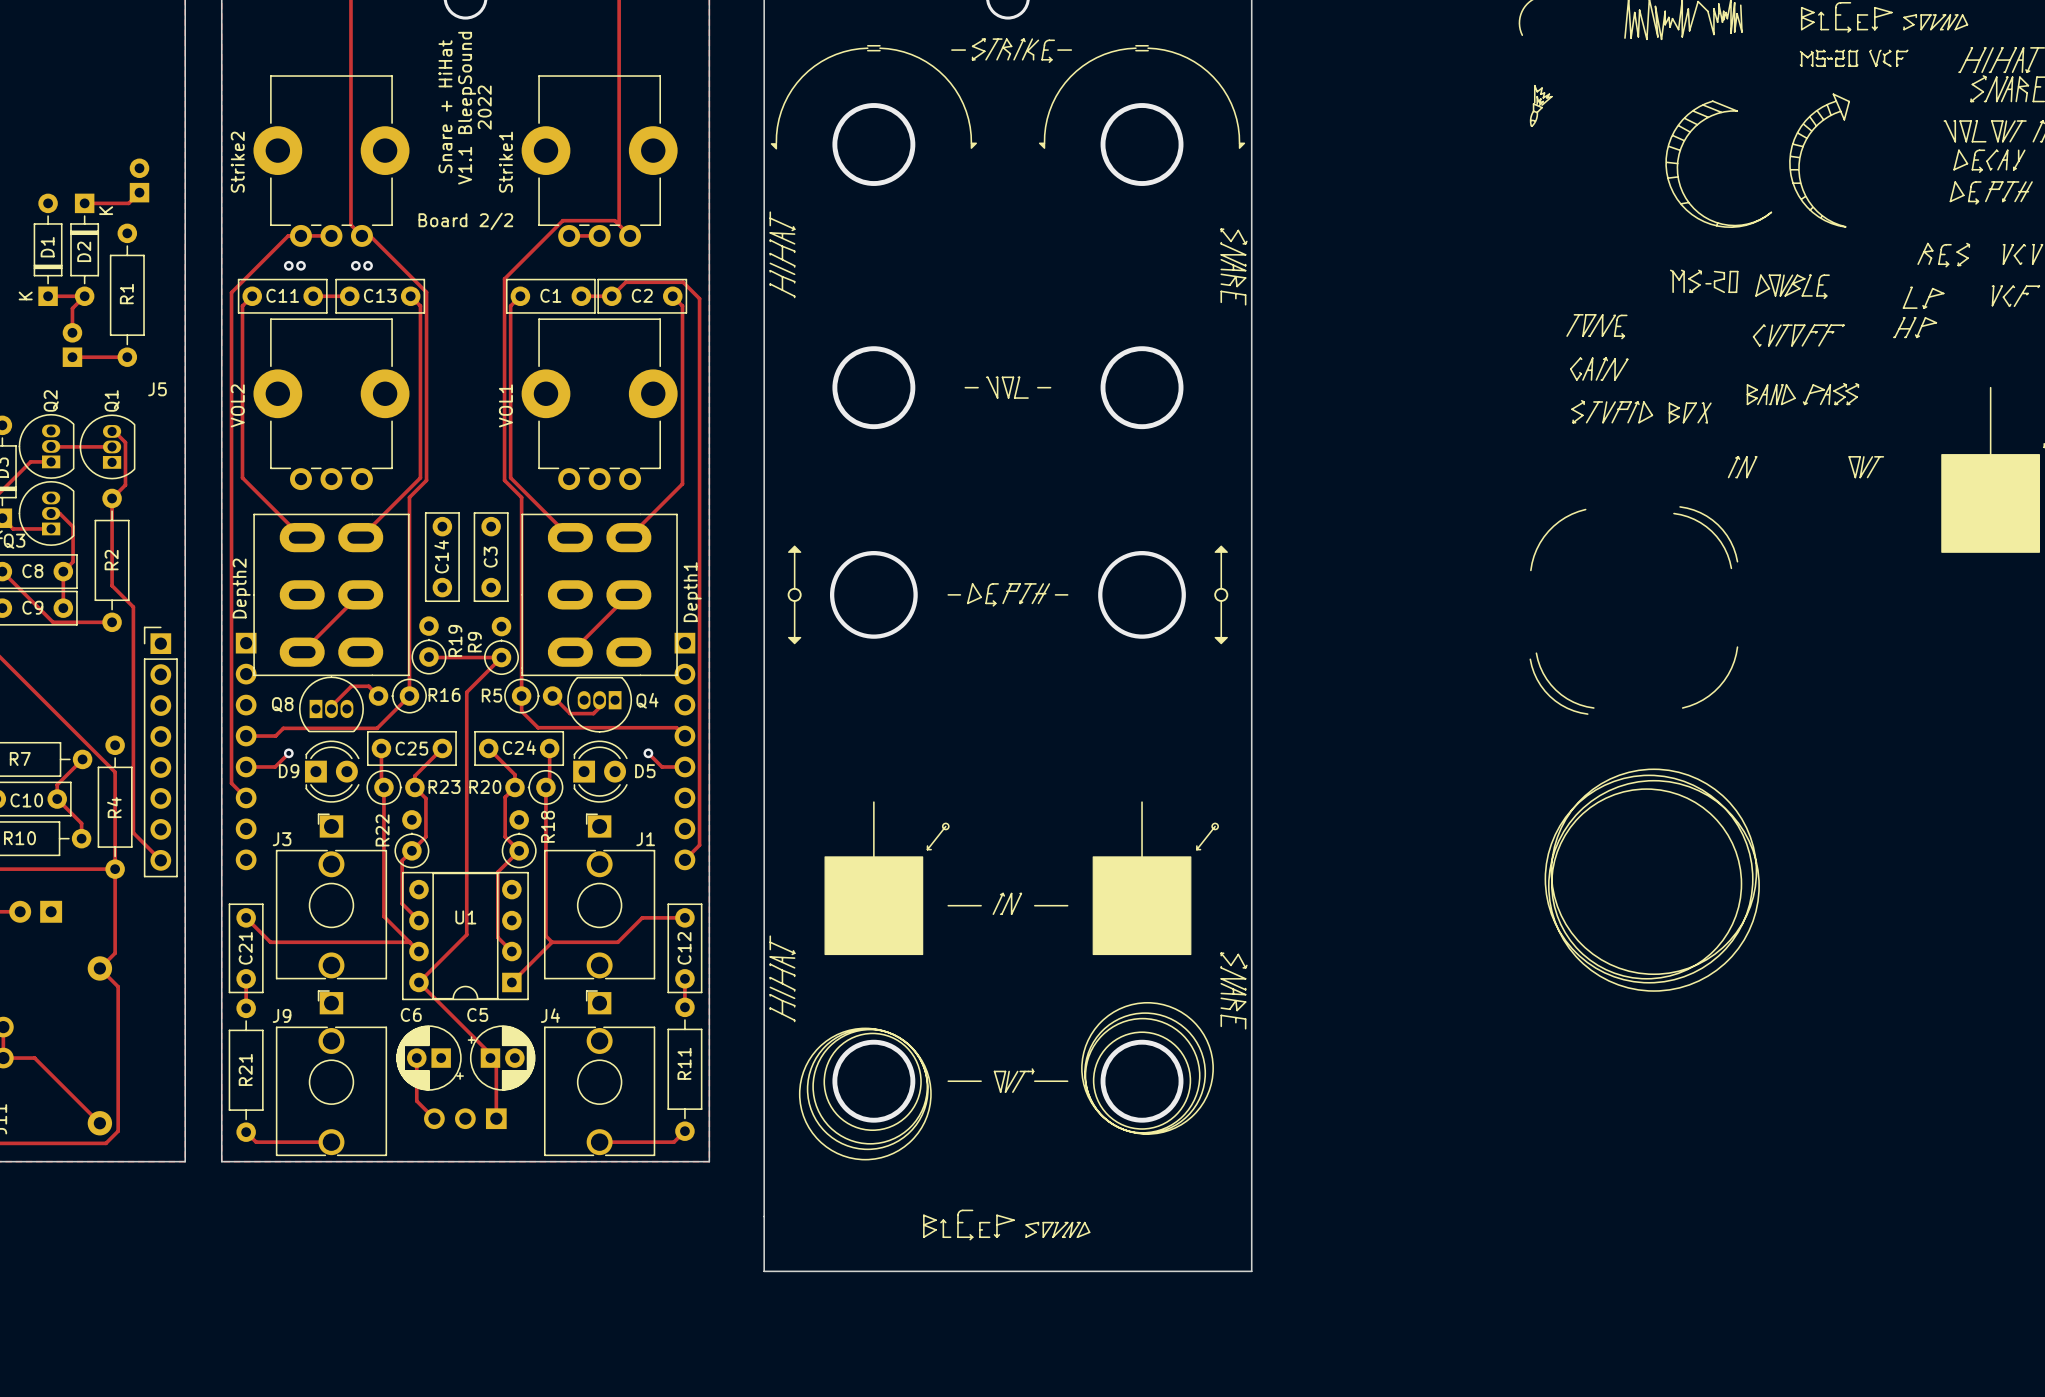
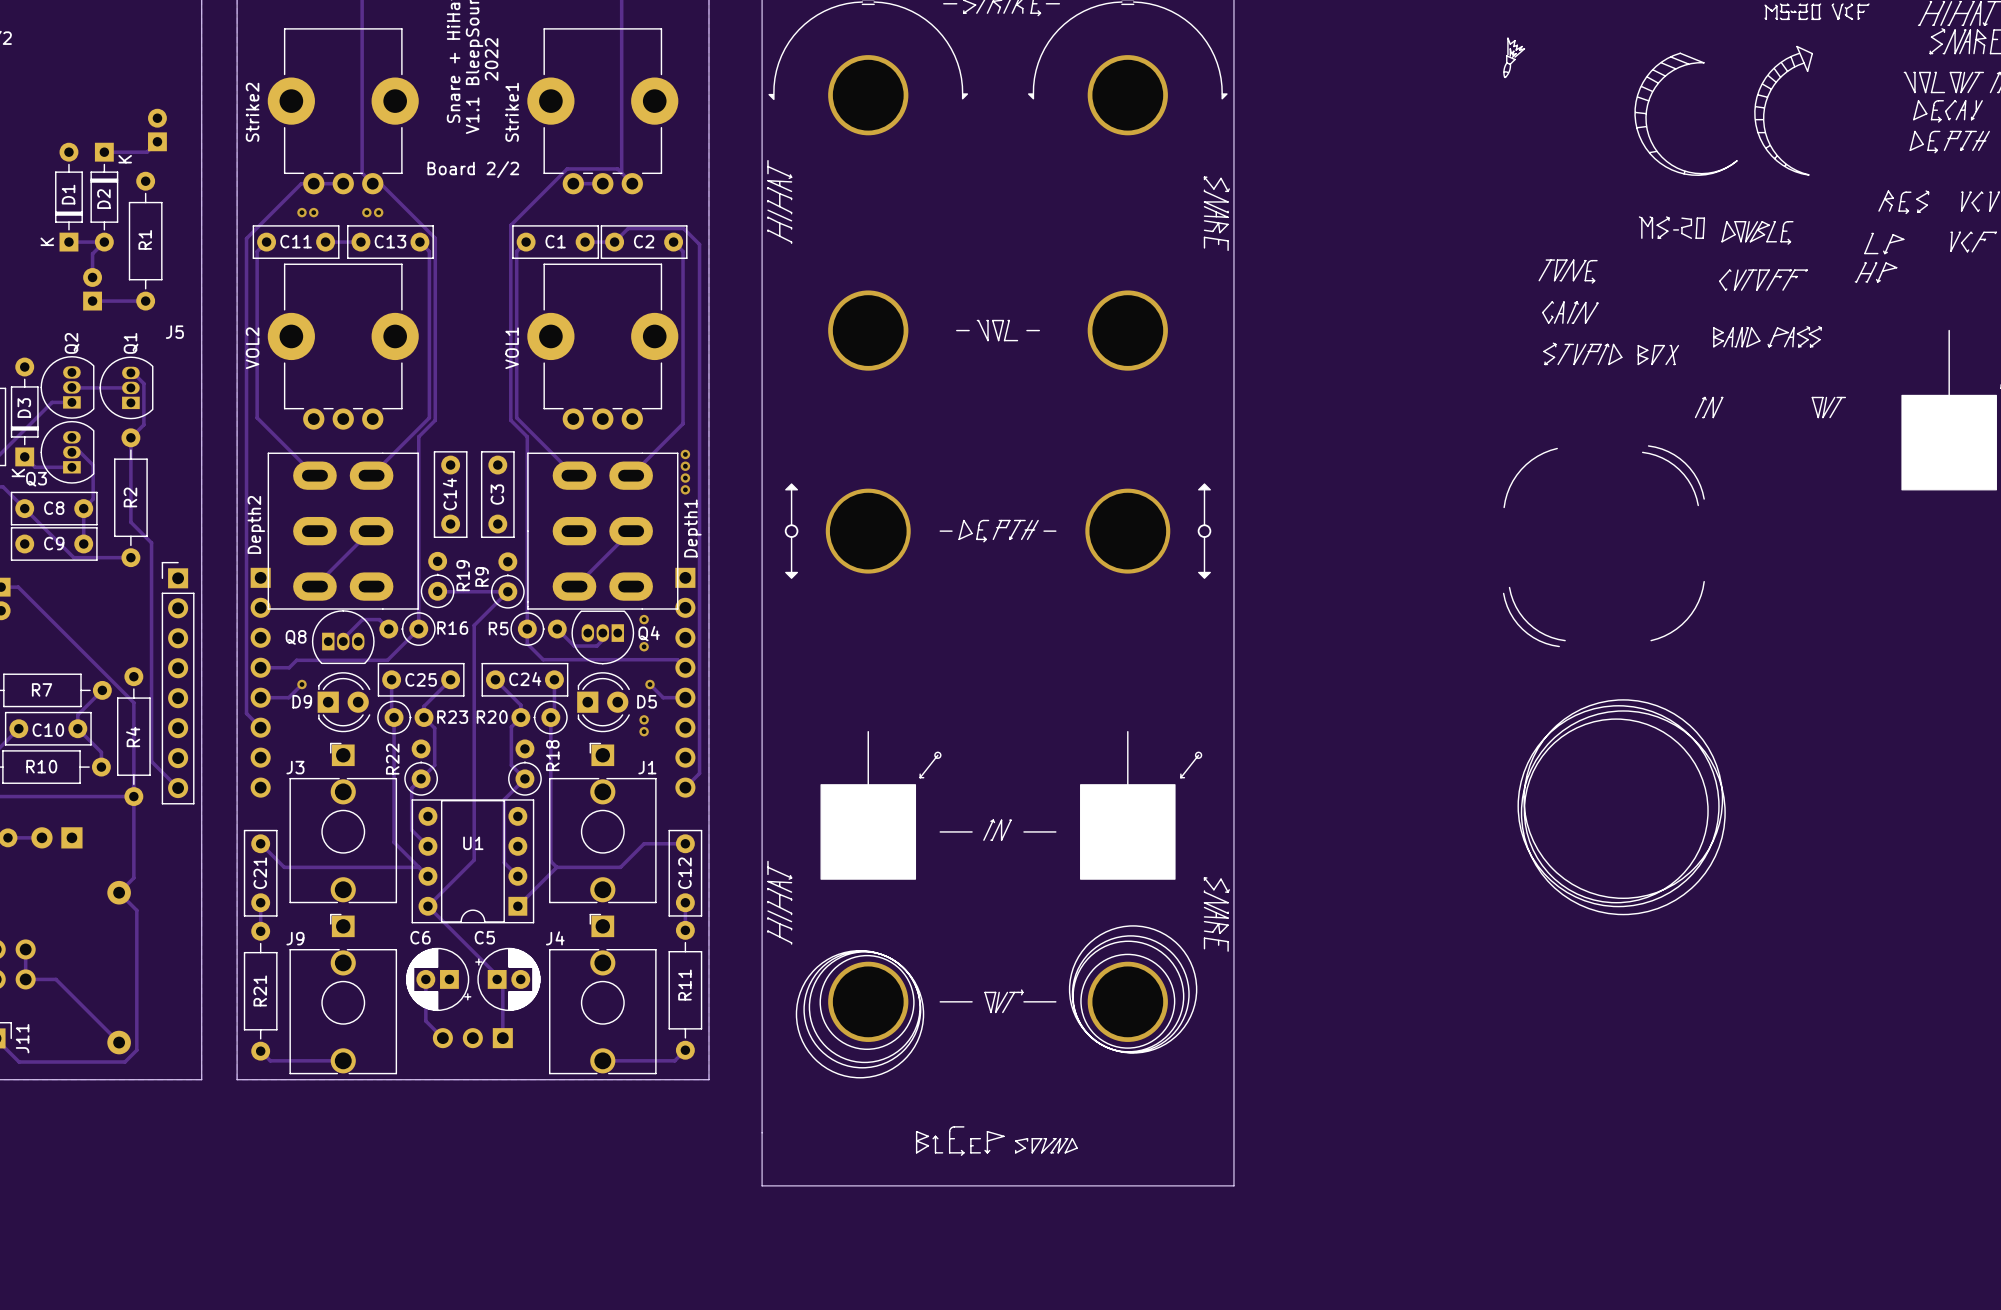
via: none -> (685, 454)
via: none -> (685, 466)
via: none -> (685, 478)
via: none -> (685, 489)
via: none -> (644, 619)
via: none -> (644, 646)
via: none -> (644, 719)
via: none -> (644, 731)

